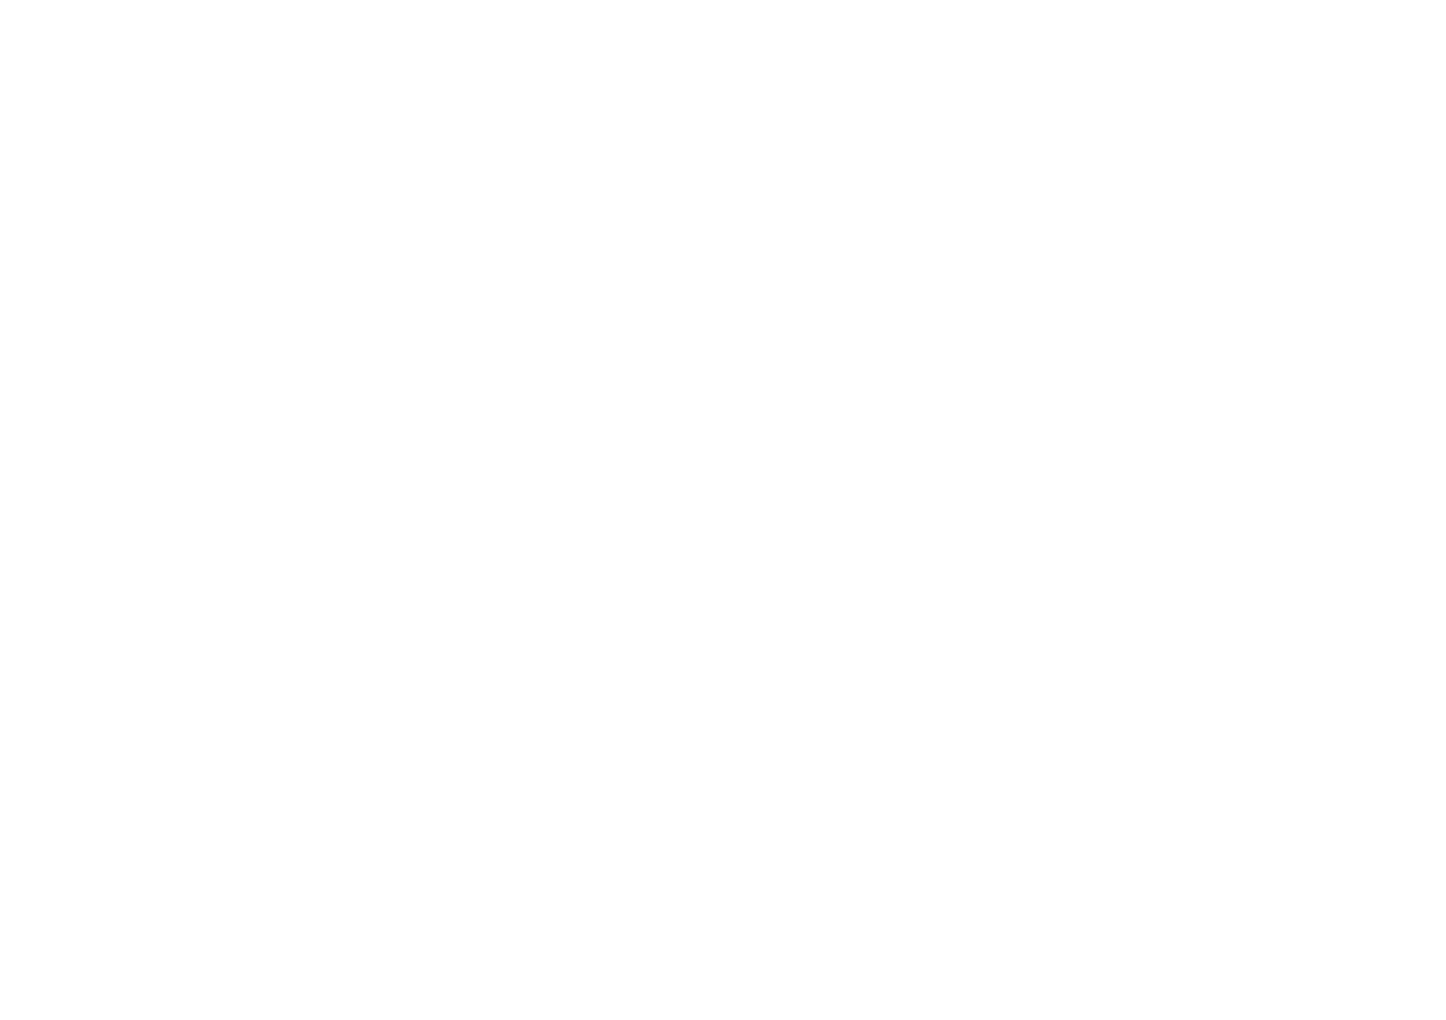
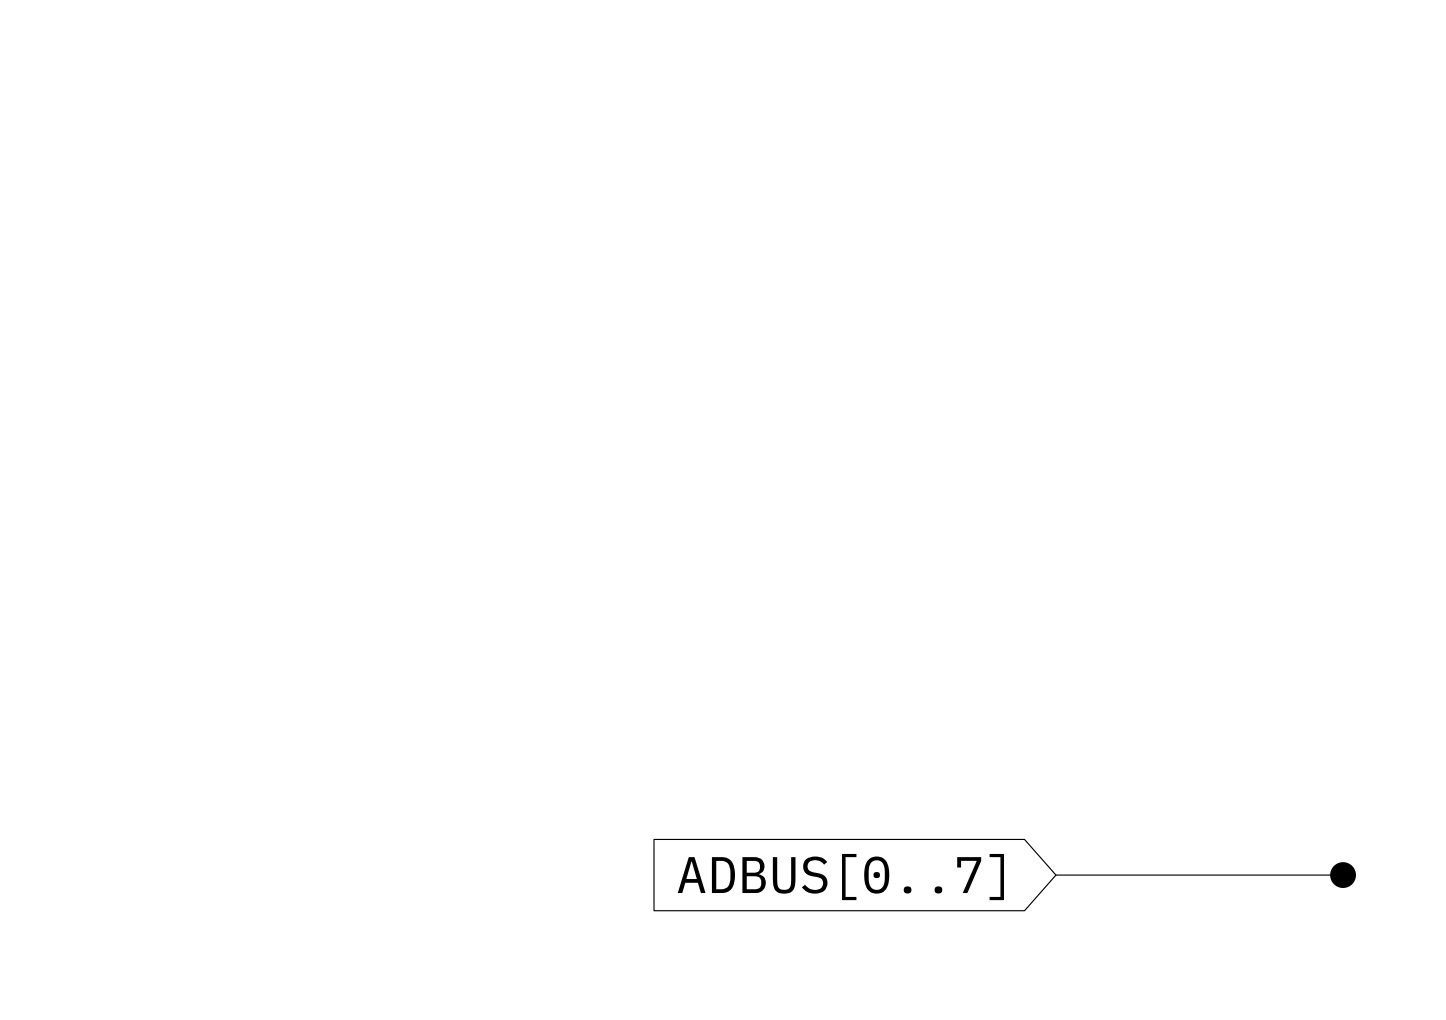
bus: none -> (1055, 875) (1343, 875)
junction: none -> (1343, 875)
global label: none -> ADBUS[0..7] (840, 877)

